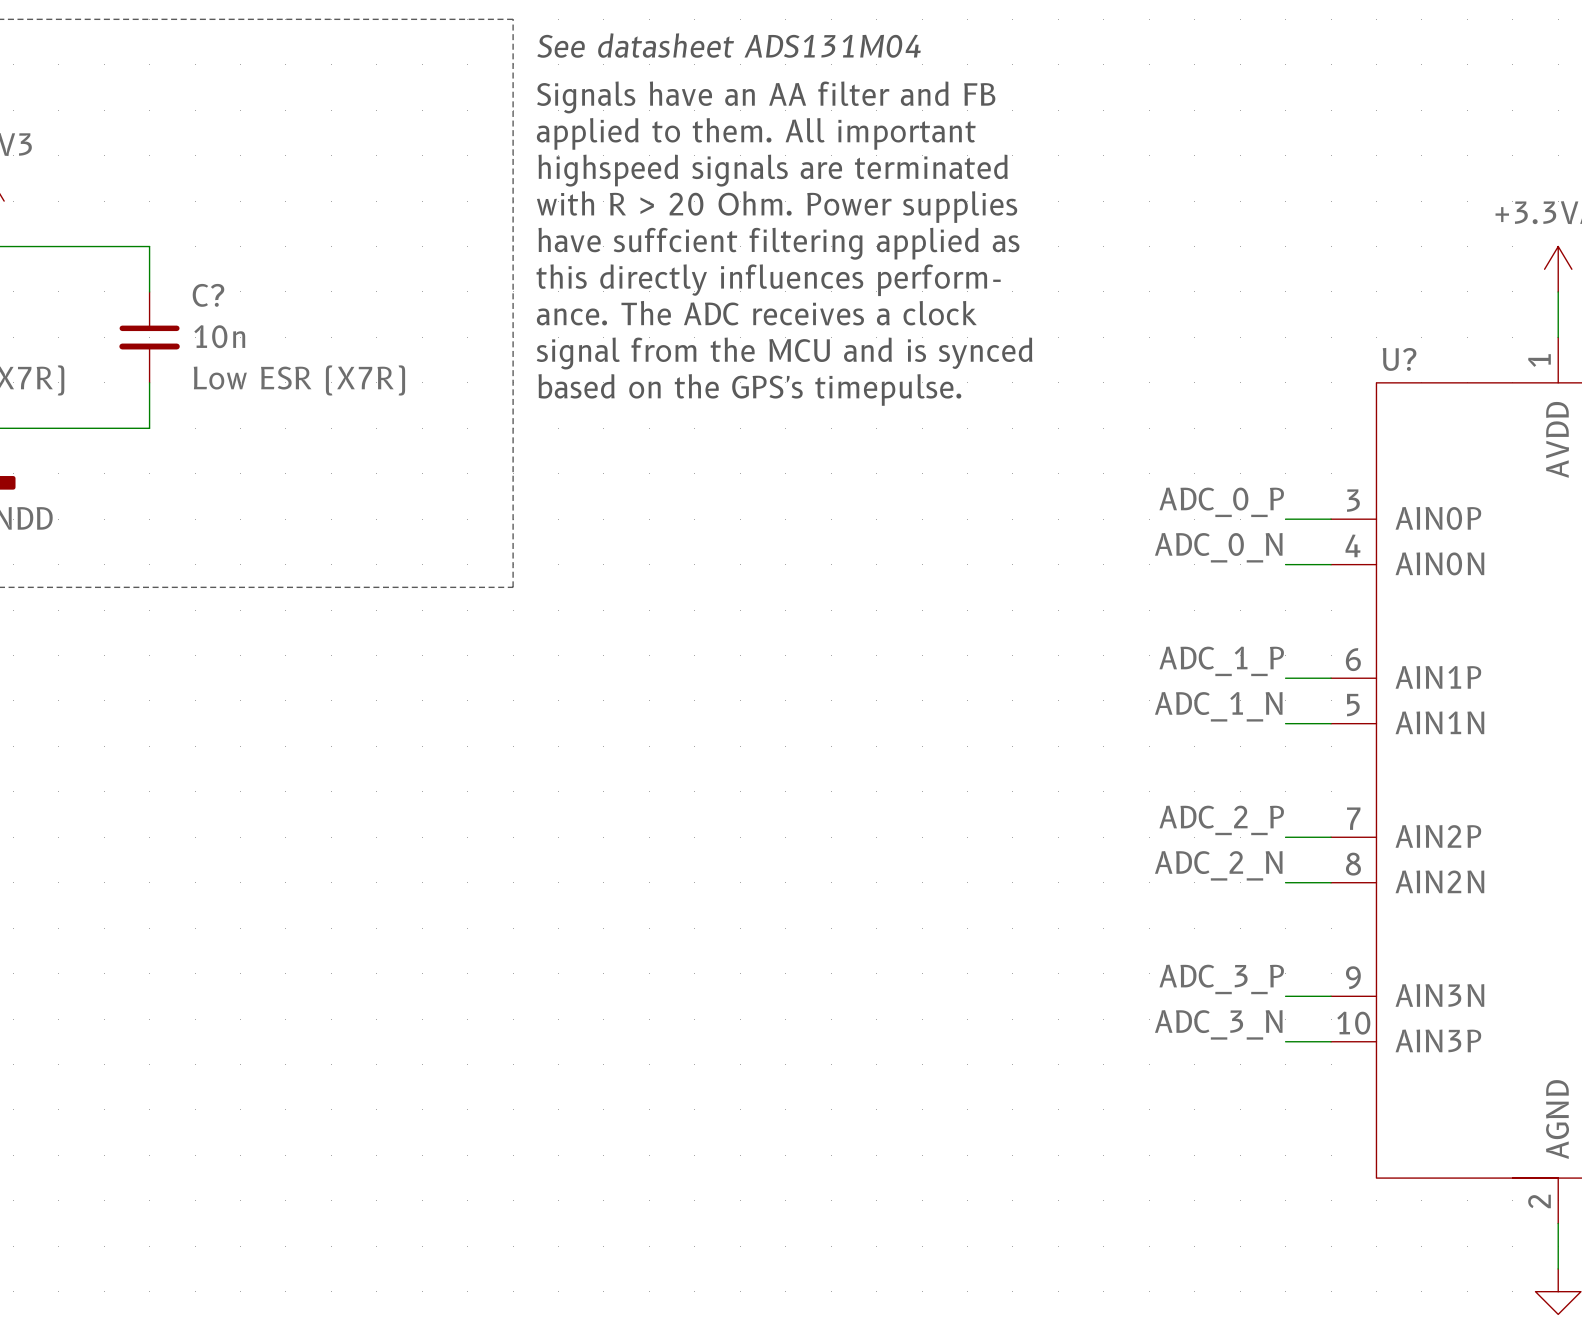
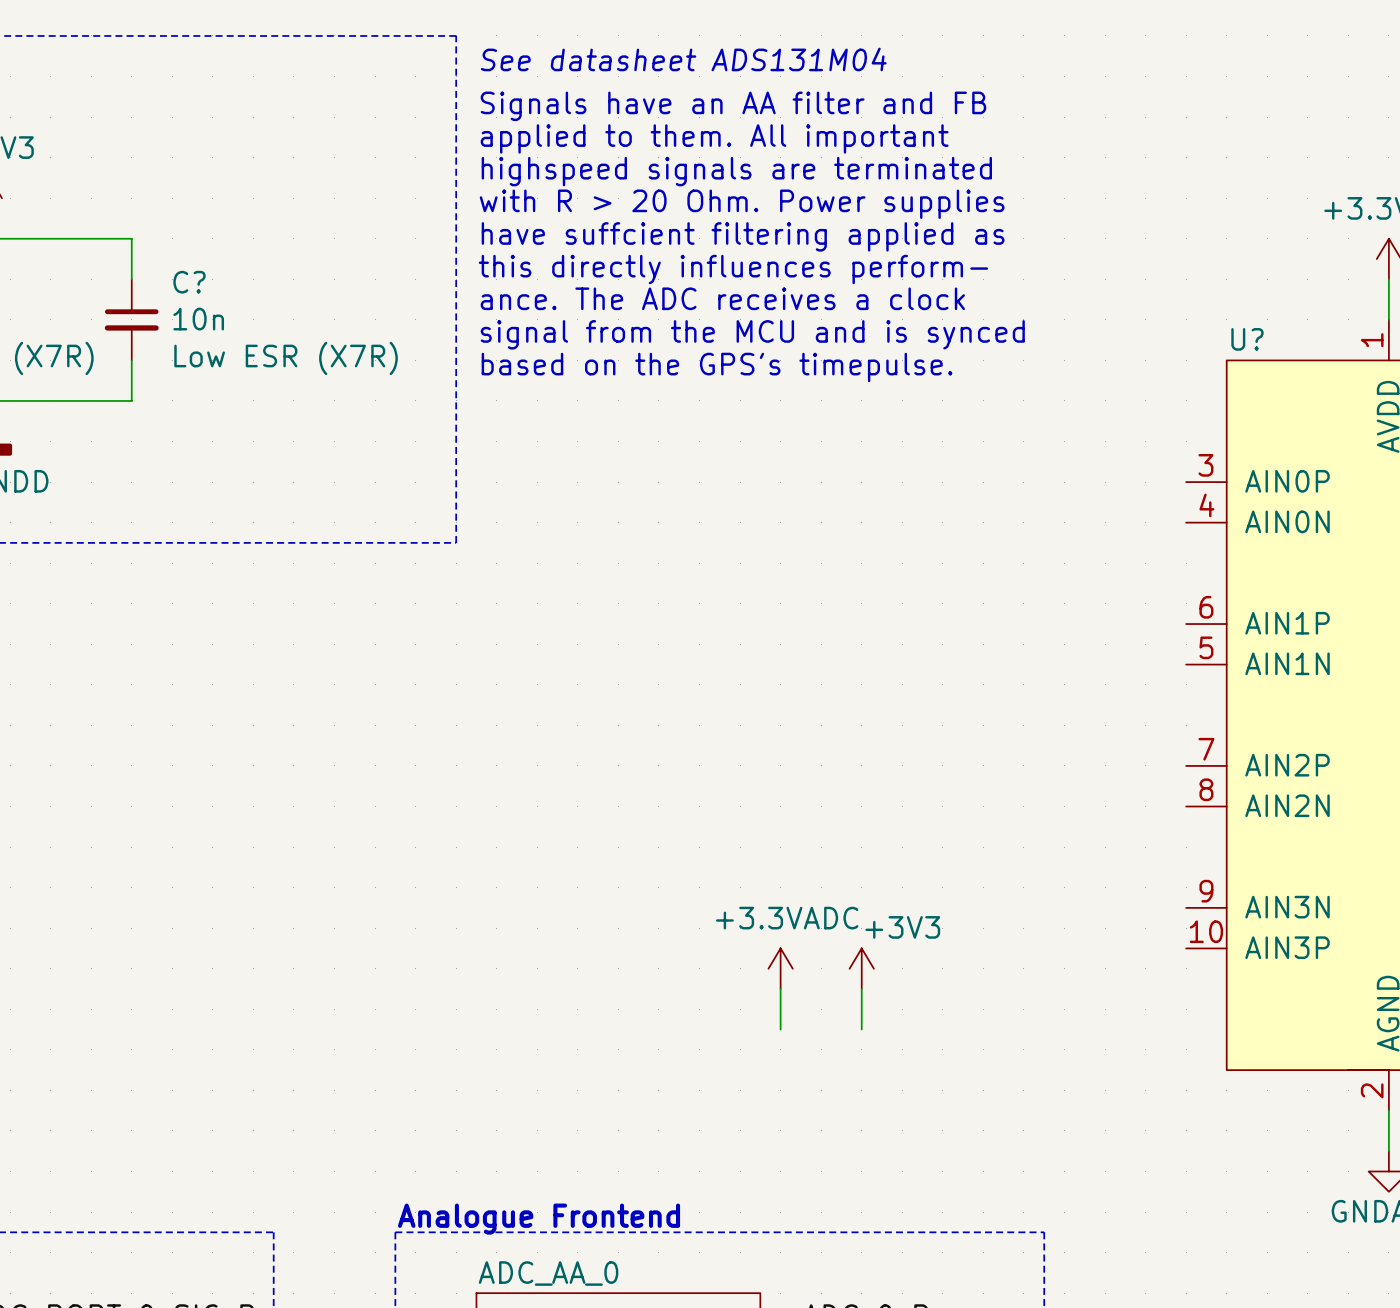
label: ADC_0_P (1221, 502) -> none
wire: (1285, 519) (1331, 519) -> none
label: ADC_0_N (1218, 547) -> none
wire: (1285, 564) (1331, 564) -> none
label: ADC_1_P (1221, 661) -> none
wire: (1285, 678) (1331, 678) -> none
label: ADC_1_N (1218, 706) -> none
wire: (1285, 723) (1331, 723) -> none
label: ADC_2_P (1221, 820) -> none
wire: (1285, 837) (1331, 837) -> none
label: ADC_2_N (1218, 865) -> none
wire: (1285, 882) (1331, 882) -> none
label: ADC_3_P (1221, 979) -> none
wire: (1285, 996) (1331, 996) -> none
label: ADC_3_N (1218, 1024) -> none
wire: (1285, 1041) (1331, 1041) -> none
power symbol: none -> +3.3VADC (780, 968)
power symbol: none -> +3V3 (861, 968)
wire: none -> (780, 989) (780, 1029)
wire: none -> (861, 989) (861, 1029)

